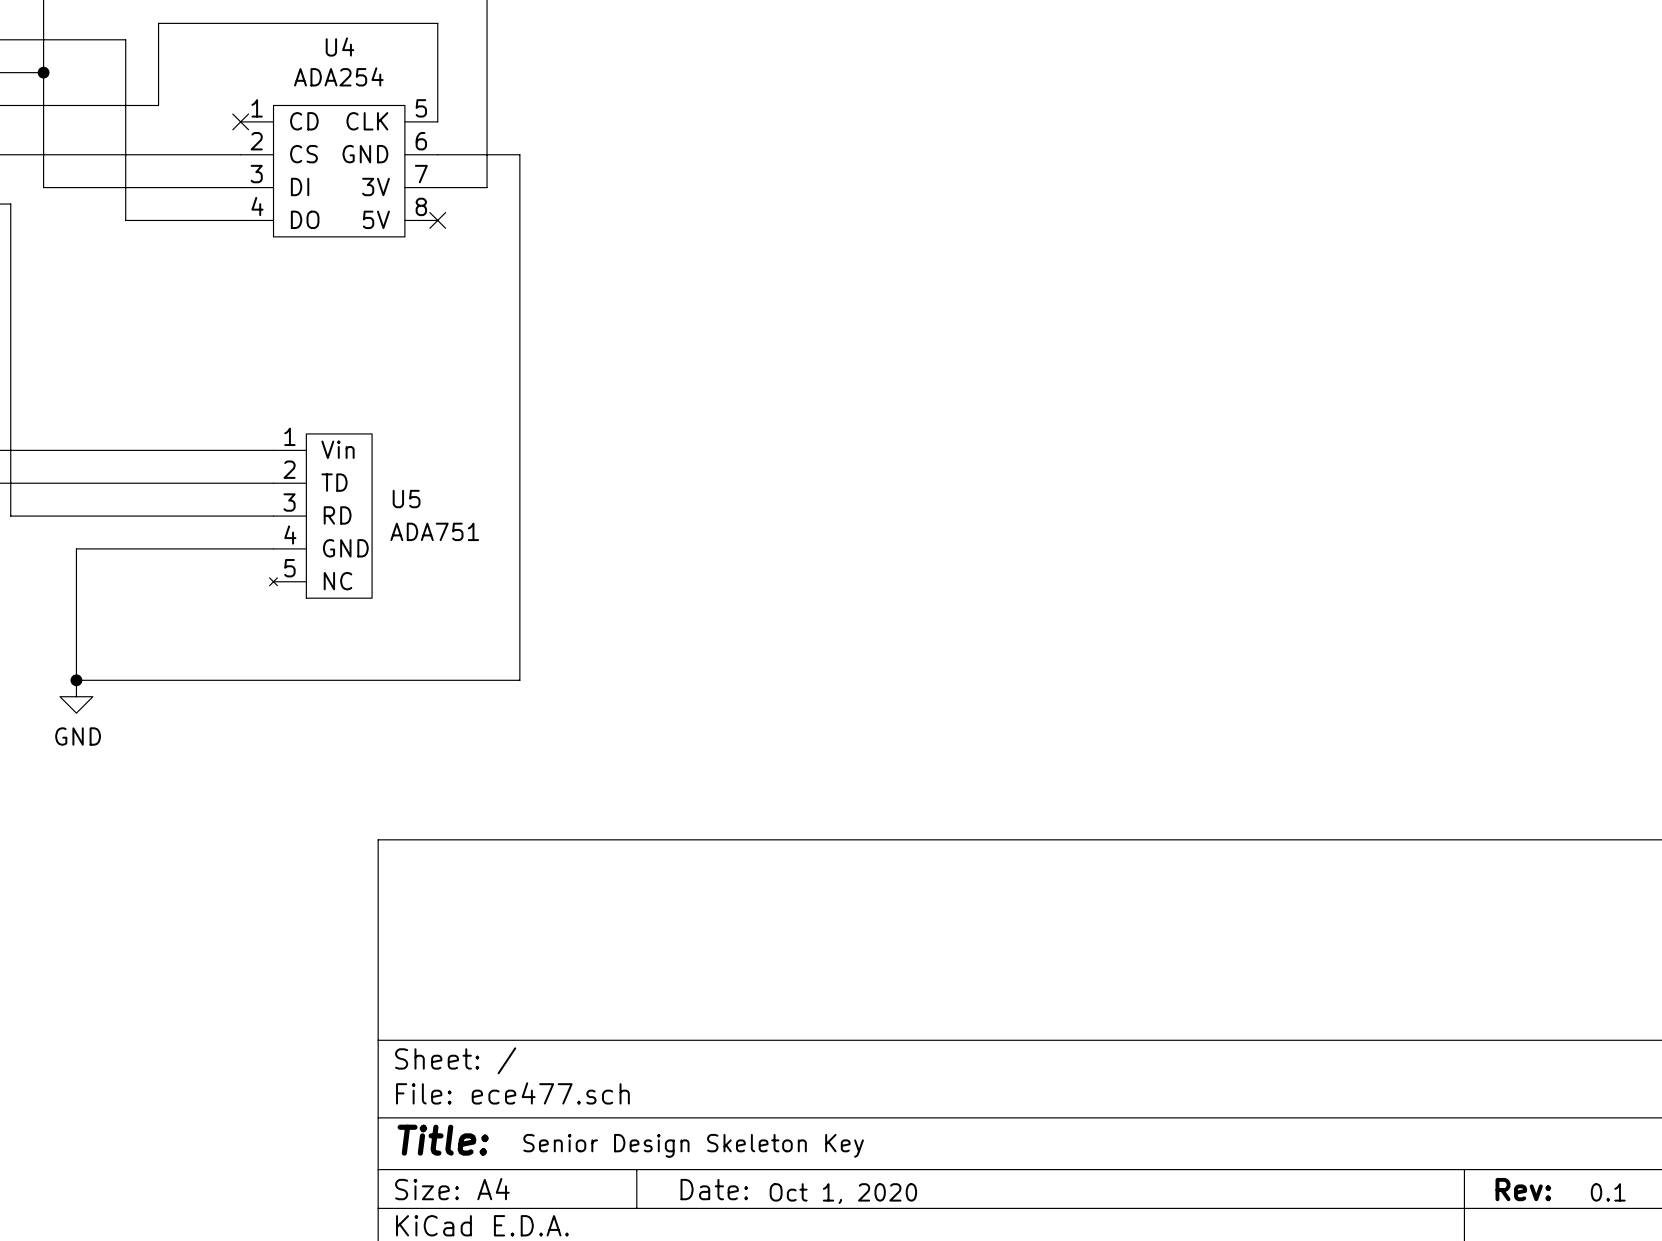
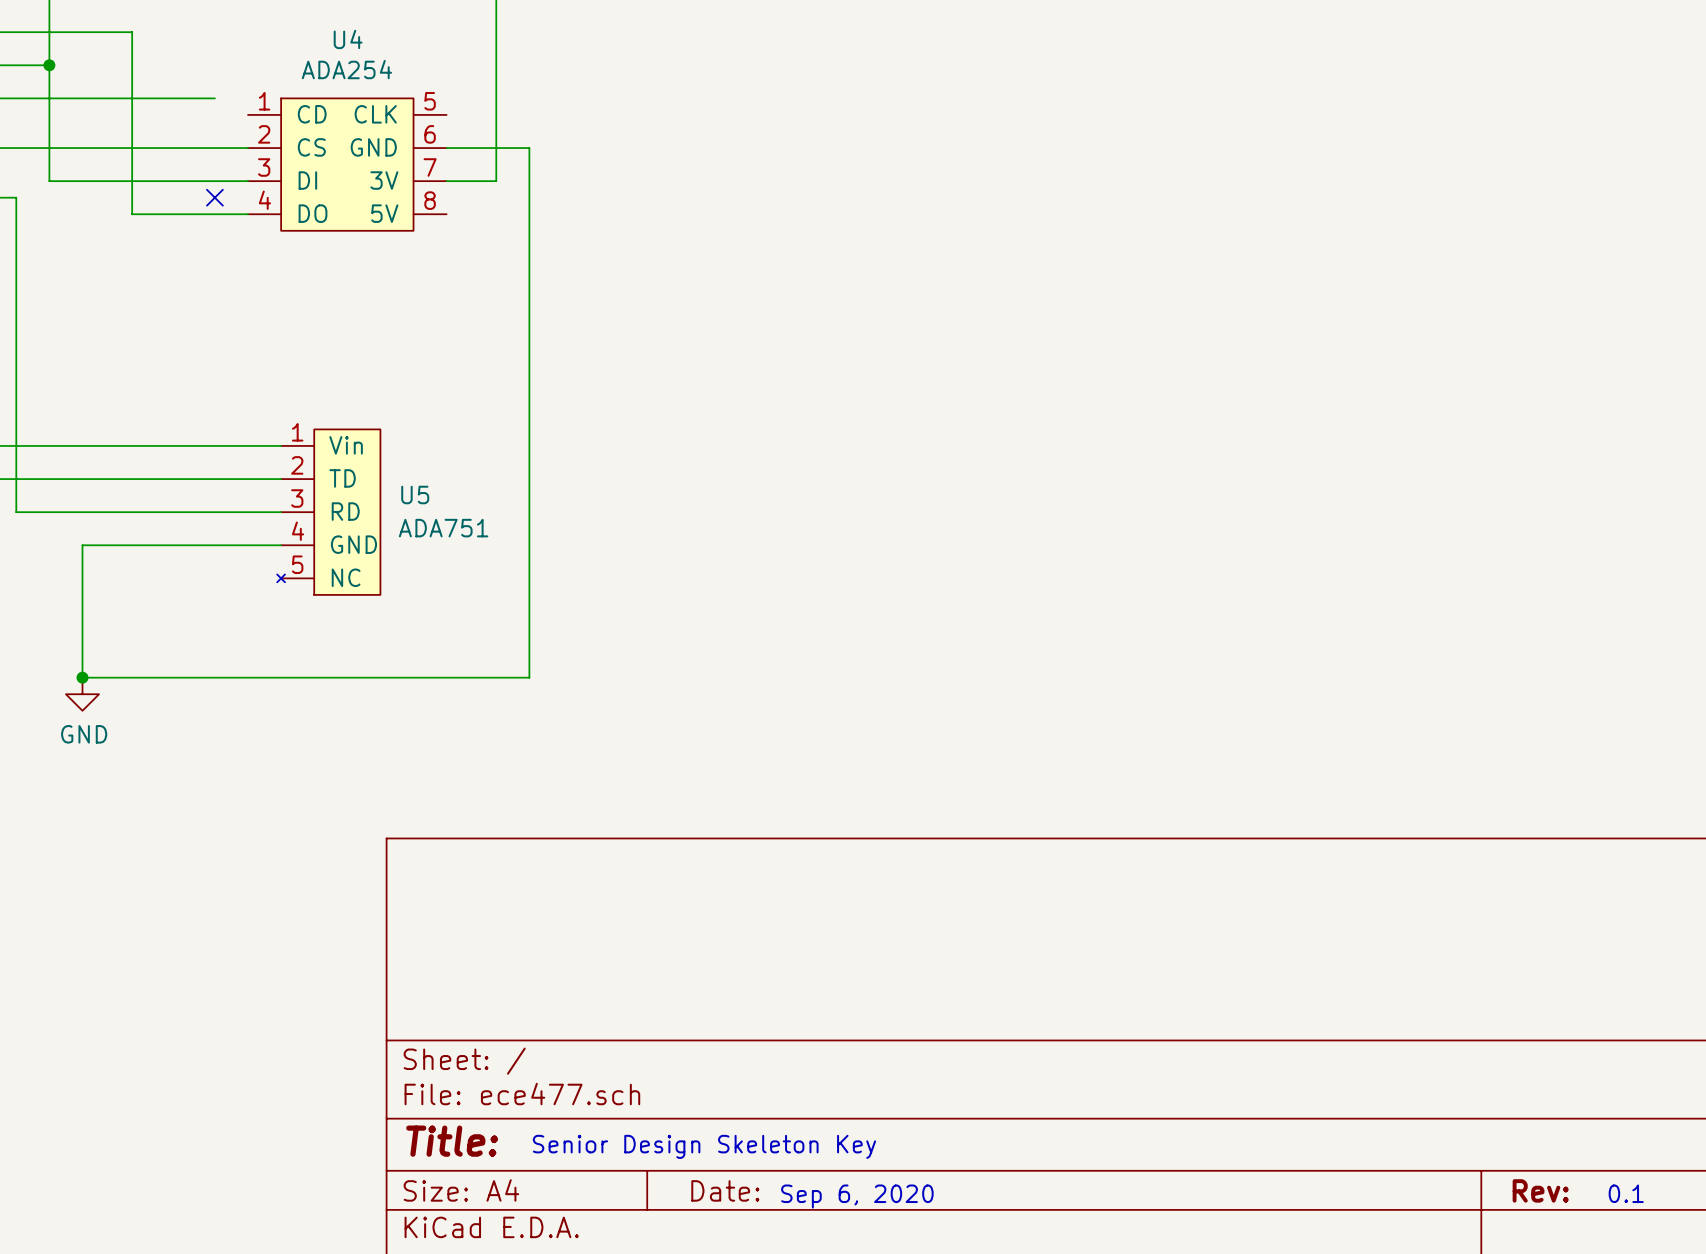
wire: (158, 105) (158, 23) (437, 23) (437, 121) -> (165, 98) (214, 98)
no-connect mark: (240, 121) -> none
no-connect mark: none -> (214, 197)
no-connect mark: (437, 220) -> none
text: Oct 1, 2020 (843, 1193) -> Sep 6, 2020 (857, 1196)

